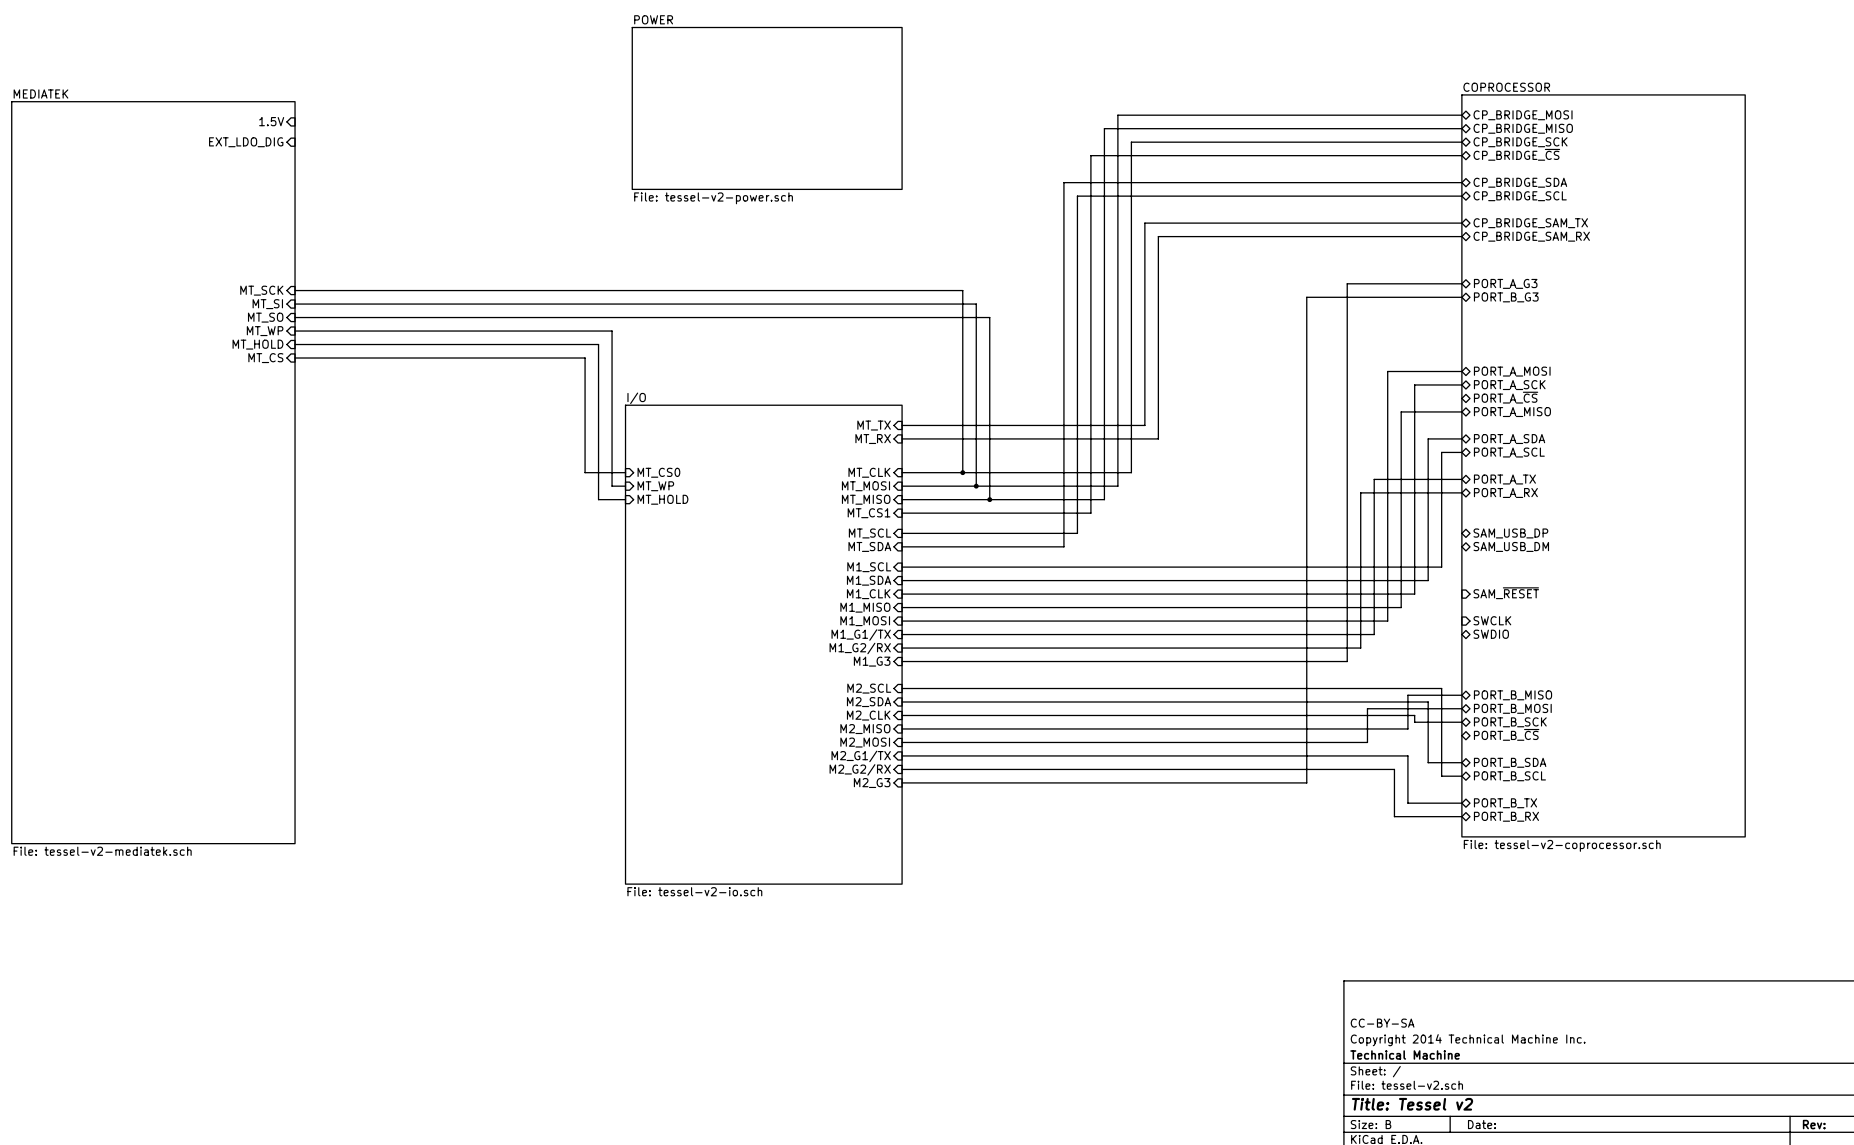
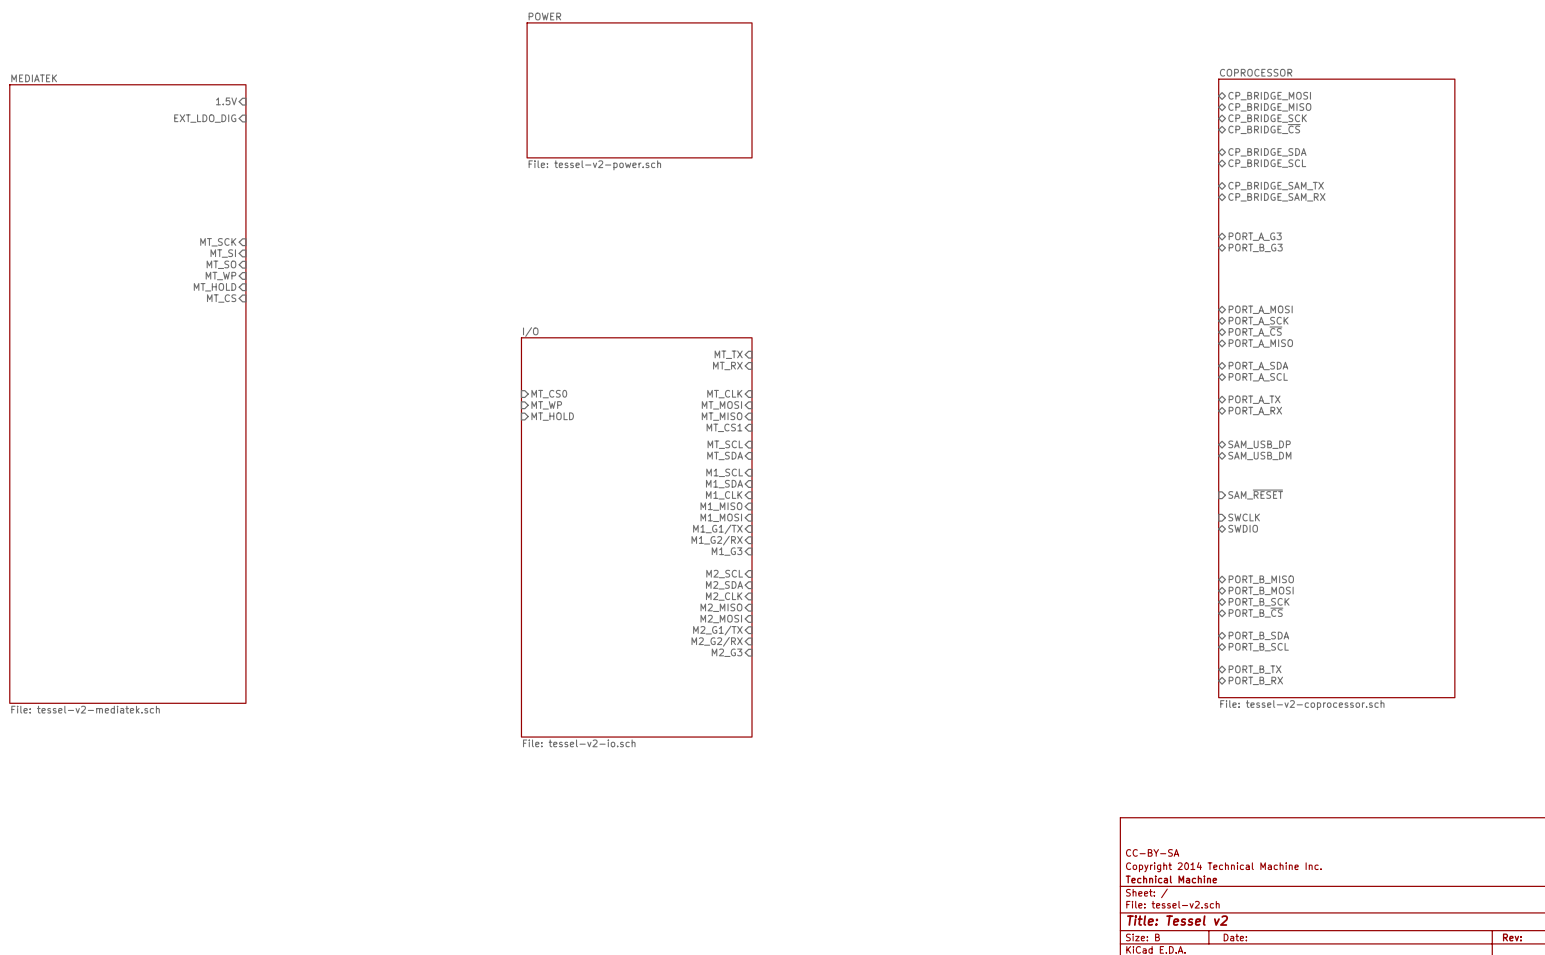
wire: (1461, 115) (1117, 115) (1117, 486) (902, 486) -> none
wire: (1461, 128) (1104, 128) (1104, 499) (902, 499) -> none
wire: (1461, 142) (1131, 142) (1131, 472) (902, 472) -> none
wire: (1461, 155) (1090, 155) (1090, 513) (902, 513) -> none
wire: (1461, 182) (1063, 182) (1063, 546) (902, 546) -> none
wire: (1461, 196) (1077, 196) (1077, 533) (902, 533) -> none
wire: (1461, 223) (1144, 223) (1144, 425) (902, 425) -> none
wire: (1461, 236) (1158, 236) (1158, 438) (902, 438) -> none
wire: (1461, 283) (1347, 283) (1347, 661) (902, 661) -> none
wire: (295, 290) (962, 290) (962, 472) -> none
wire: (1461, 297) (1306, 297) (1306, 782) (902, 782) -> none
wire: (295, 304) (976, 304) (976, 486) -> none
wire: (295, 317) (989, 317) (989, 499) -> none
wire: (295, 331) (612, 331) (612, 486) (625, 486) -> none
wire: (295, 344) (598, 344) (598, 499) (625, 499) -> none
wire: (295, 358) (585, 358) (585, 472) (625, 472) -> none
wire: (1461, 371) (1387, 371) (1387, 621) (902, 621) -> none
wire: (1461, 384) (1414, 384) (1414, 594) (902, 594) -> none
wire: (1461, 411) (1401, 411) (1401, 607) (902, 607) -> none
wire: (1461, 438) (1428, 438) (1428, 580) (902, 580) -> none
wire: (1461, 452) (1441, 452) (1441, 567) (902, 567) -> none
junction: (962, 472) -> none
wire: (1461, 479) (1374, 479) (1374, 634) (902, 634) -> none
junction: (976, 486) -> none
wire: (1461, 492) (1360, 492) (1360, 648) (902, 648) -> none
junction: (989, 499) -> none
wire: (902, 688) (1441, 688) (1441, 776) (1461, 776) -> none
wire: (1461, 695) (1407, 695) (1407, 728) (902, 728) -> none
wire: (902, 701) (1428, 701) (1428, 762) (1461, 762) -> none
wire: (1461, 708) (1367, 708) (1367, 742) (902, 742) -> none
wire: (902, 715) (1414, 715) (1414, 722) (1461, 722) -> none
wire: (902, 755) (1407, 755) (1407, 803) (1461, 803) -> none
wire: (902, 769) (1394, 769) (1394, 816) (1461, 816) -> none

